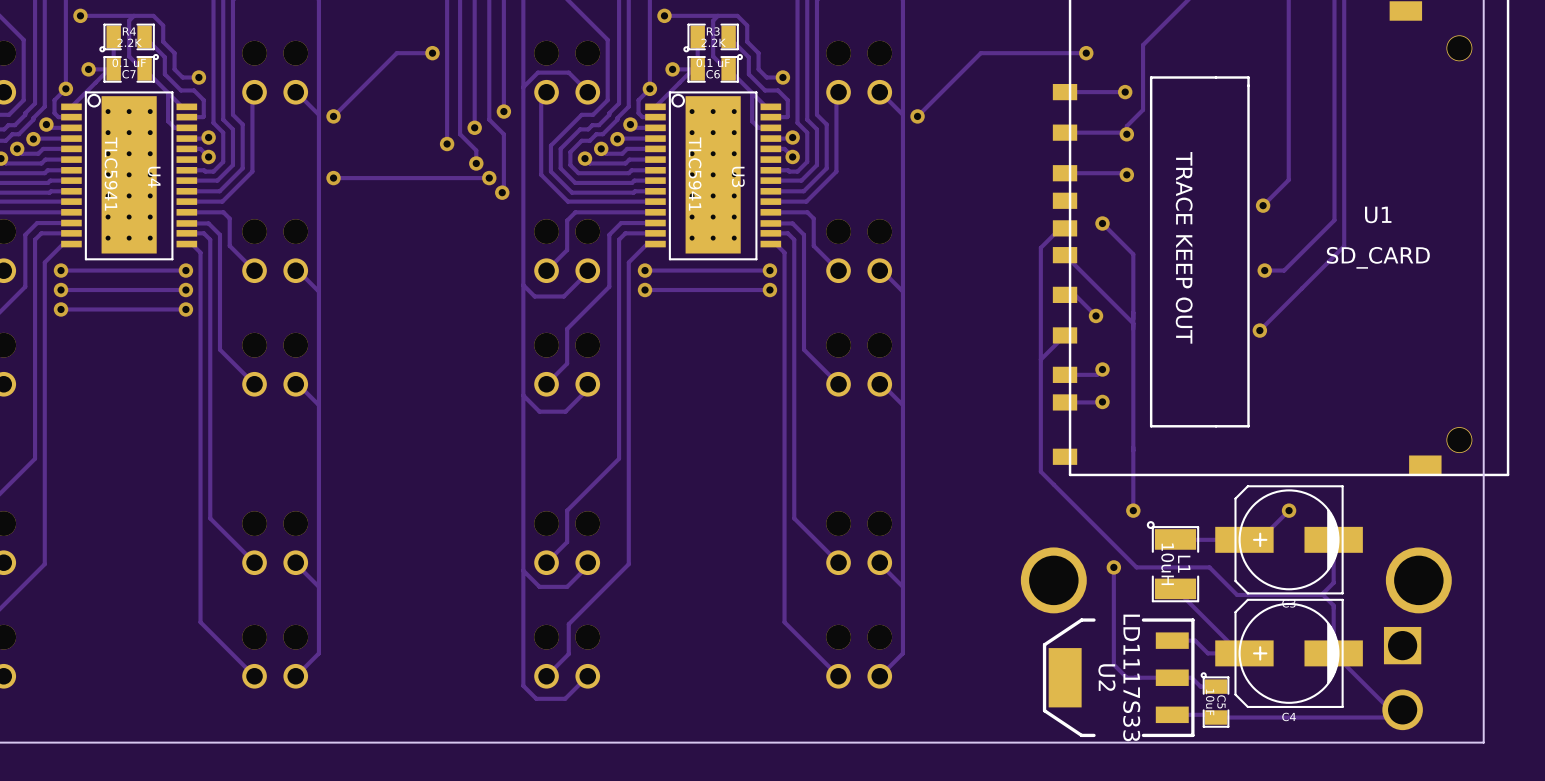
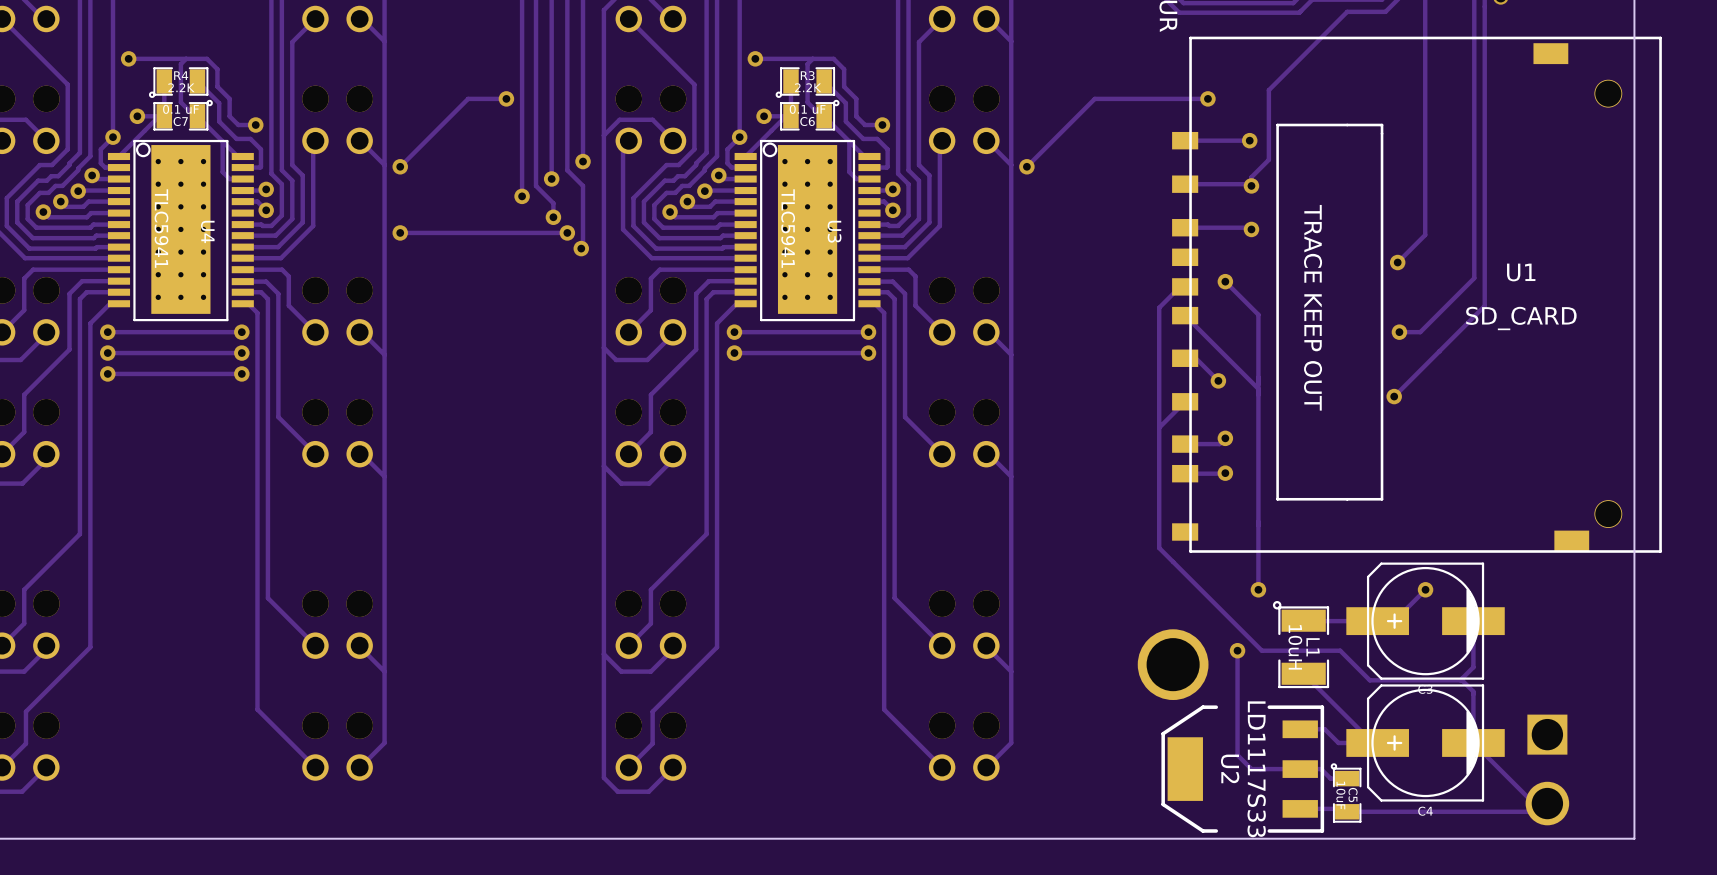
part: (1418, 580) -> none

